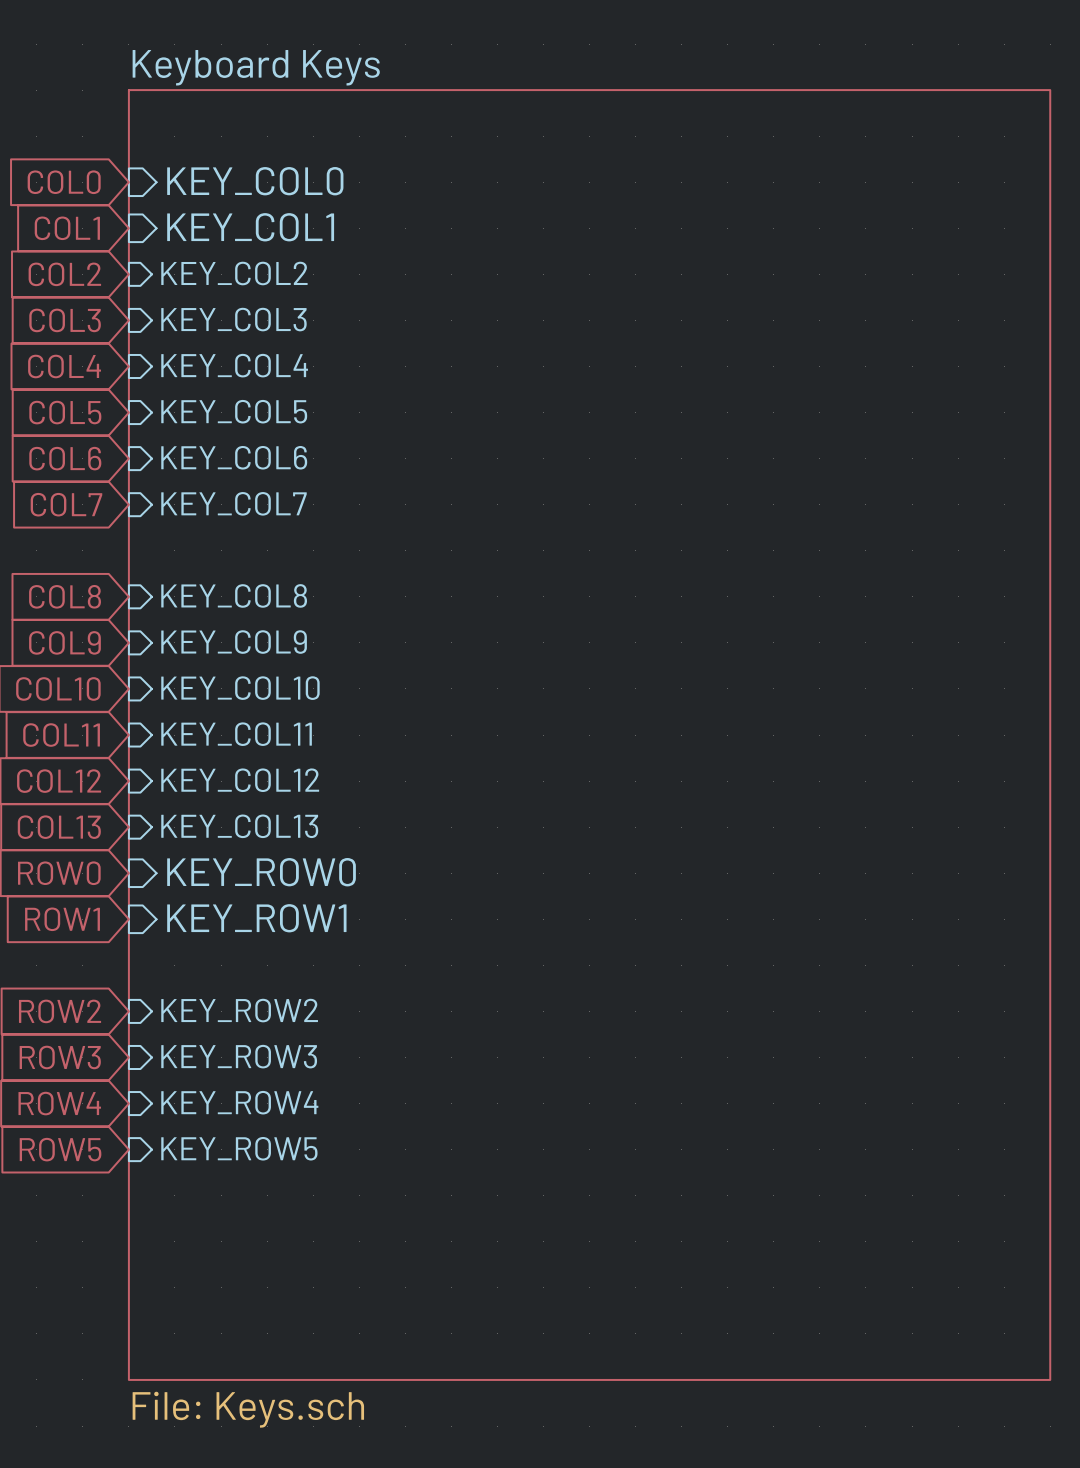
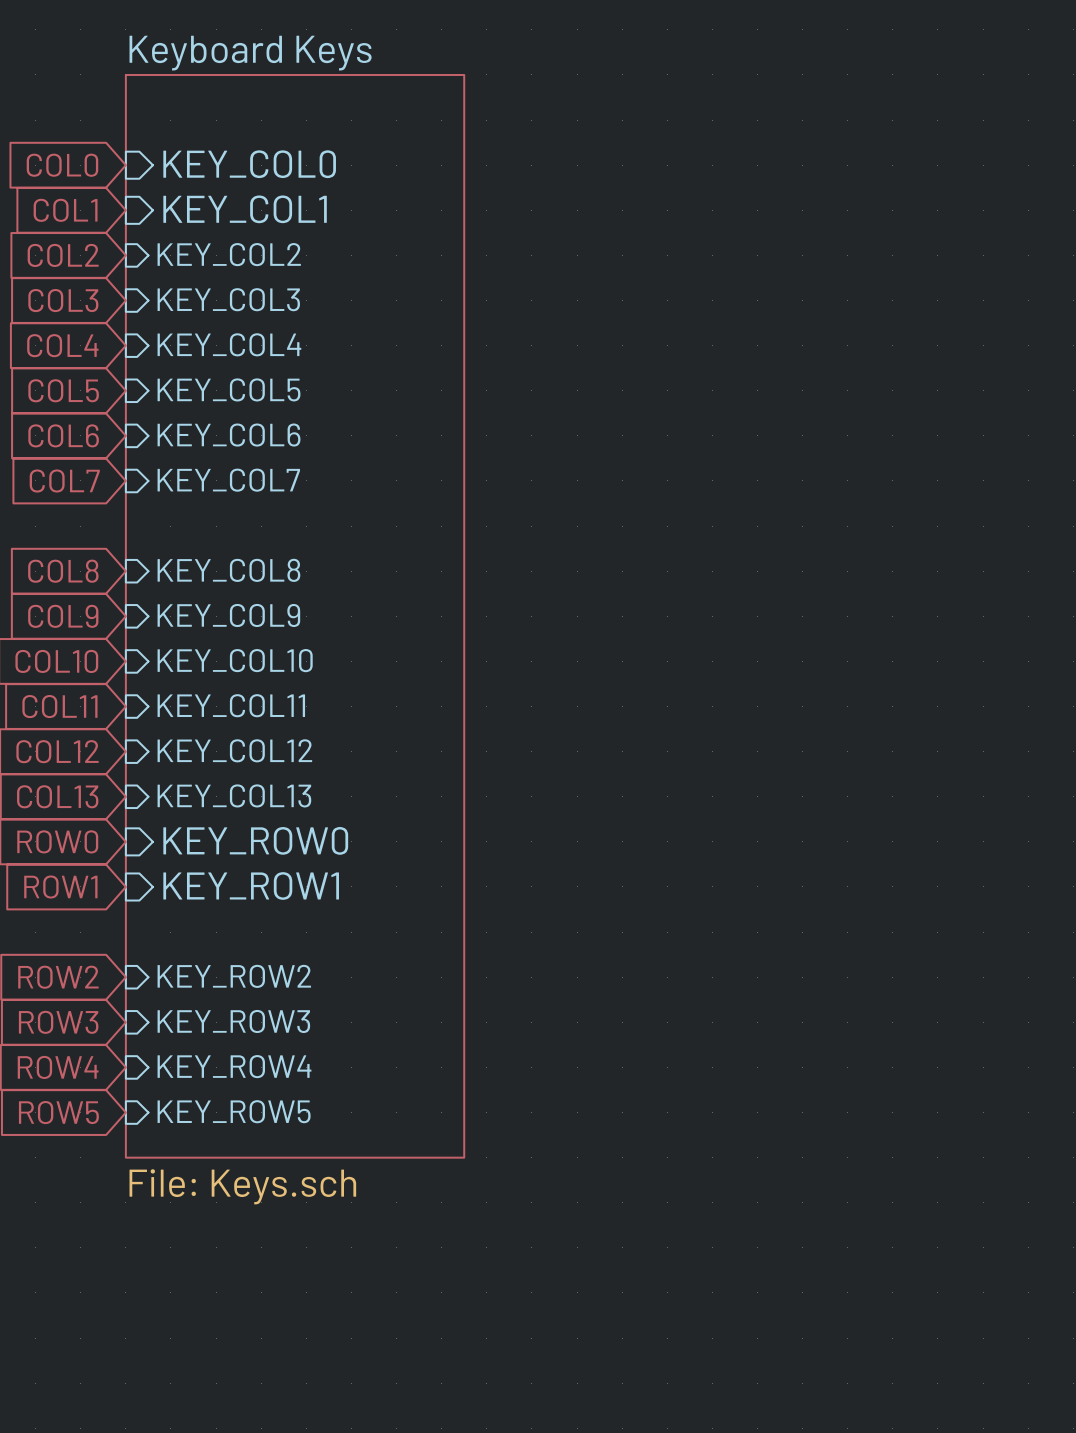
sheet Keyboard Keys: none -> File: Keys.sch (295, 616)
sheet Keyboard Keys: File: Keys.sch (589, 735) -> none

